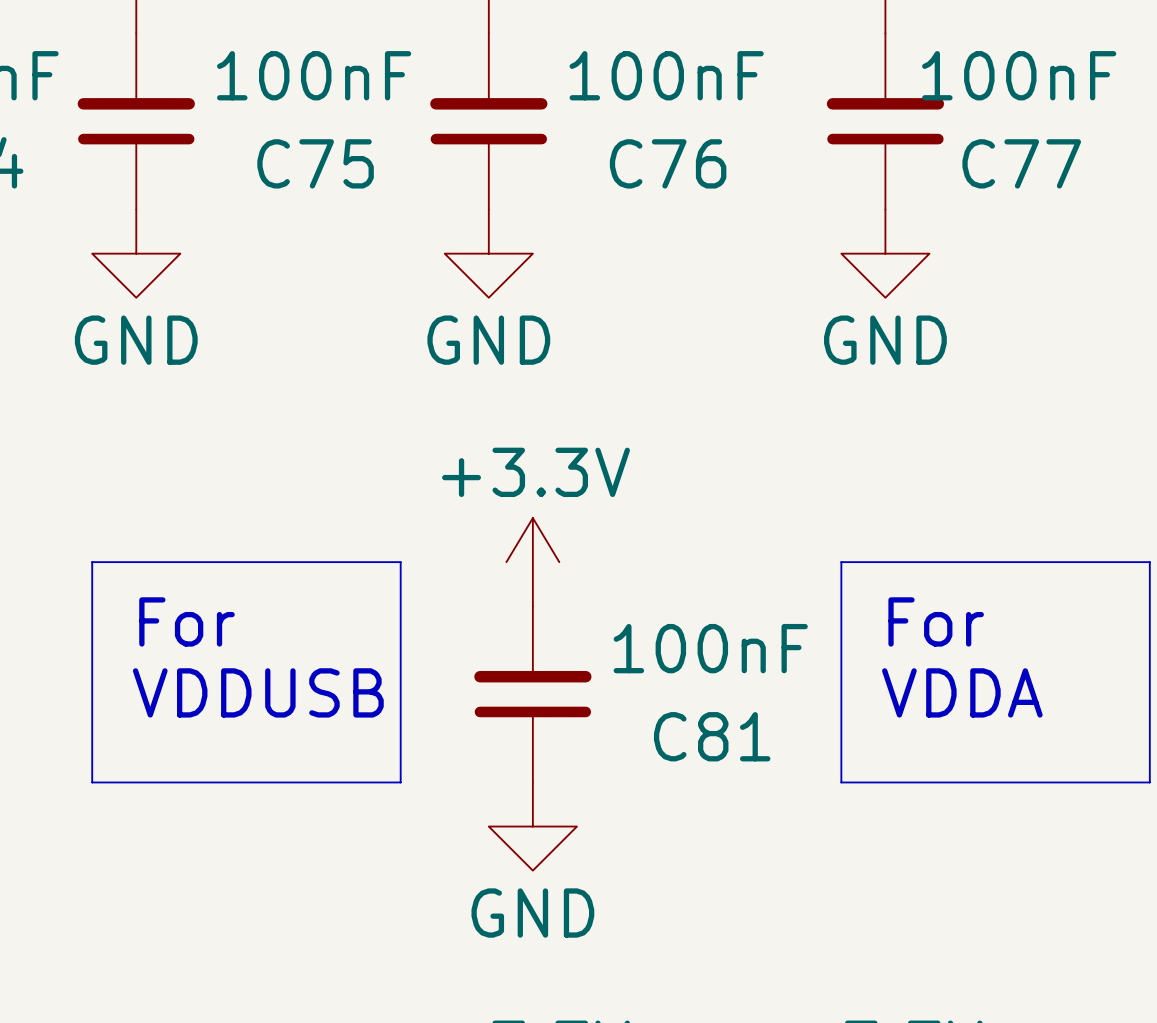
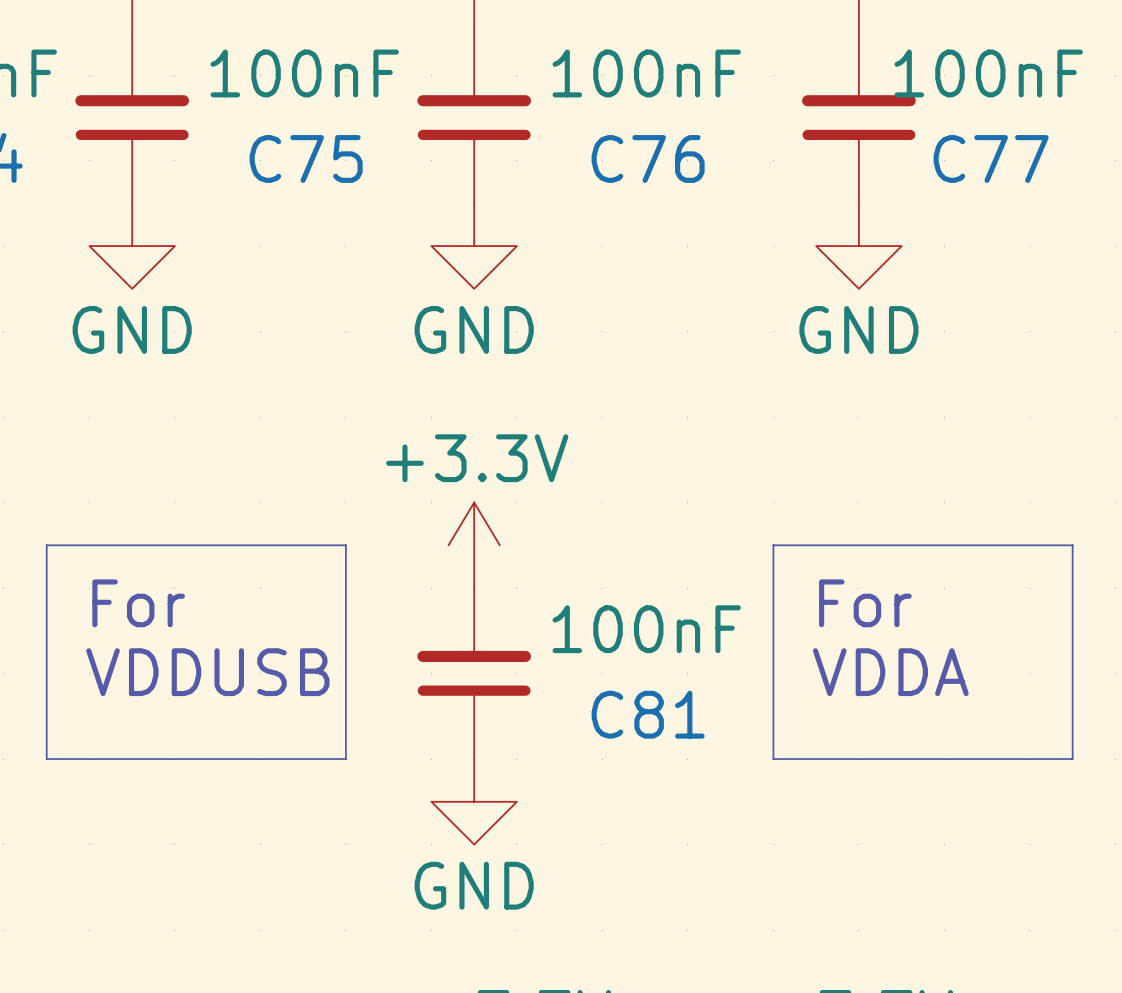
line: (92, 562) (92, 782) -> (89, 545) (46, 545) (46, 759) (89, 759)
line: (356, 562) (400, 562) (400, 782) (356, 782) -> (345, 545) (345, 759)
power symbol position: +3.3V (532, 562) -> +3.3V (474, 545)
line: (841, 562) (841, 782) -> (816, 545) (773, 545) (773, 759) (816, 759)
line: (1105, 562) (1149, 562) (1149, 782) (1105, 782) -> (1072, 545) (1072, 759)
text position: For (186, 621) -> For (138, 603)
text position: For (936, 621) -> For (865, 603)
text position: VDDUSB (258, 692) -> VDDUSB (207, 672)
text position: VDDA (962, 692) -> VDDA (890, 672)
C81 position: (532, 694) -> (474, 673)
power symbol position: GND (532, 826) -> GND (474, 801)

